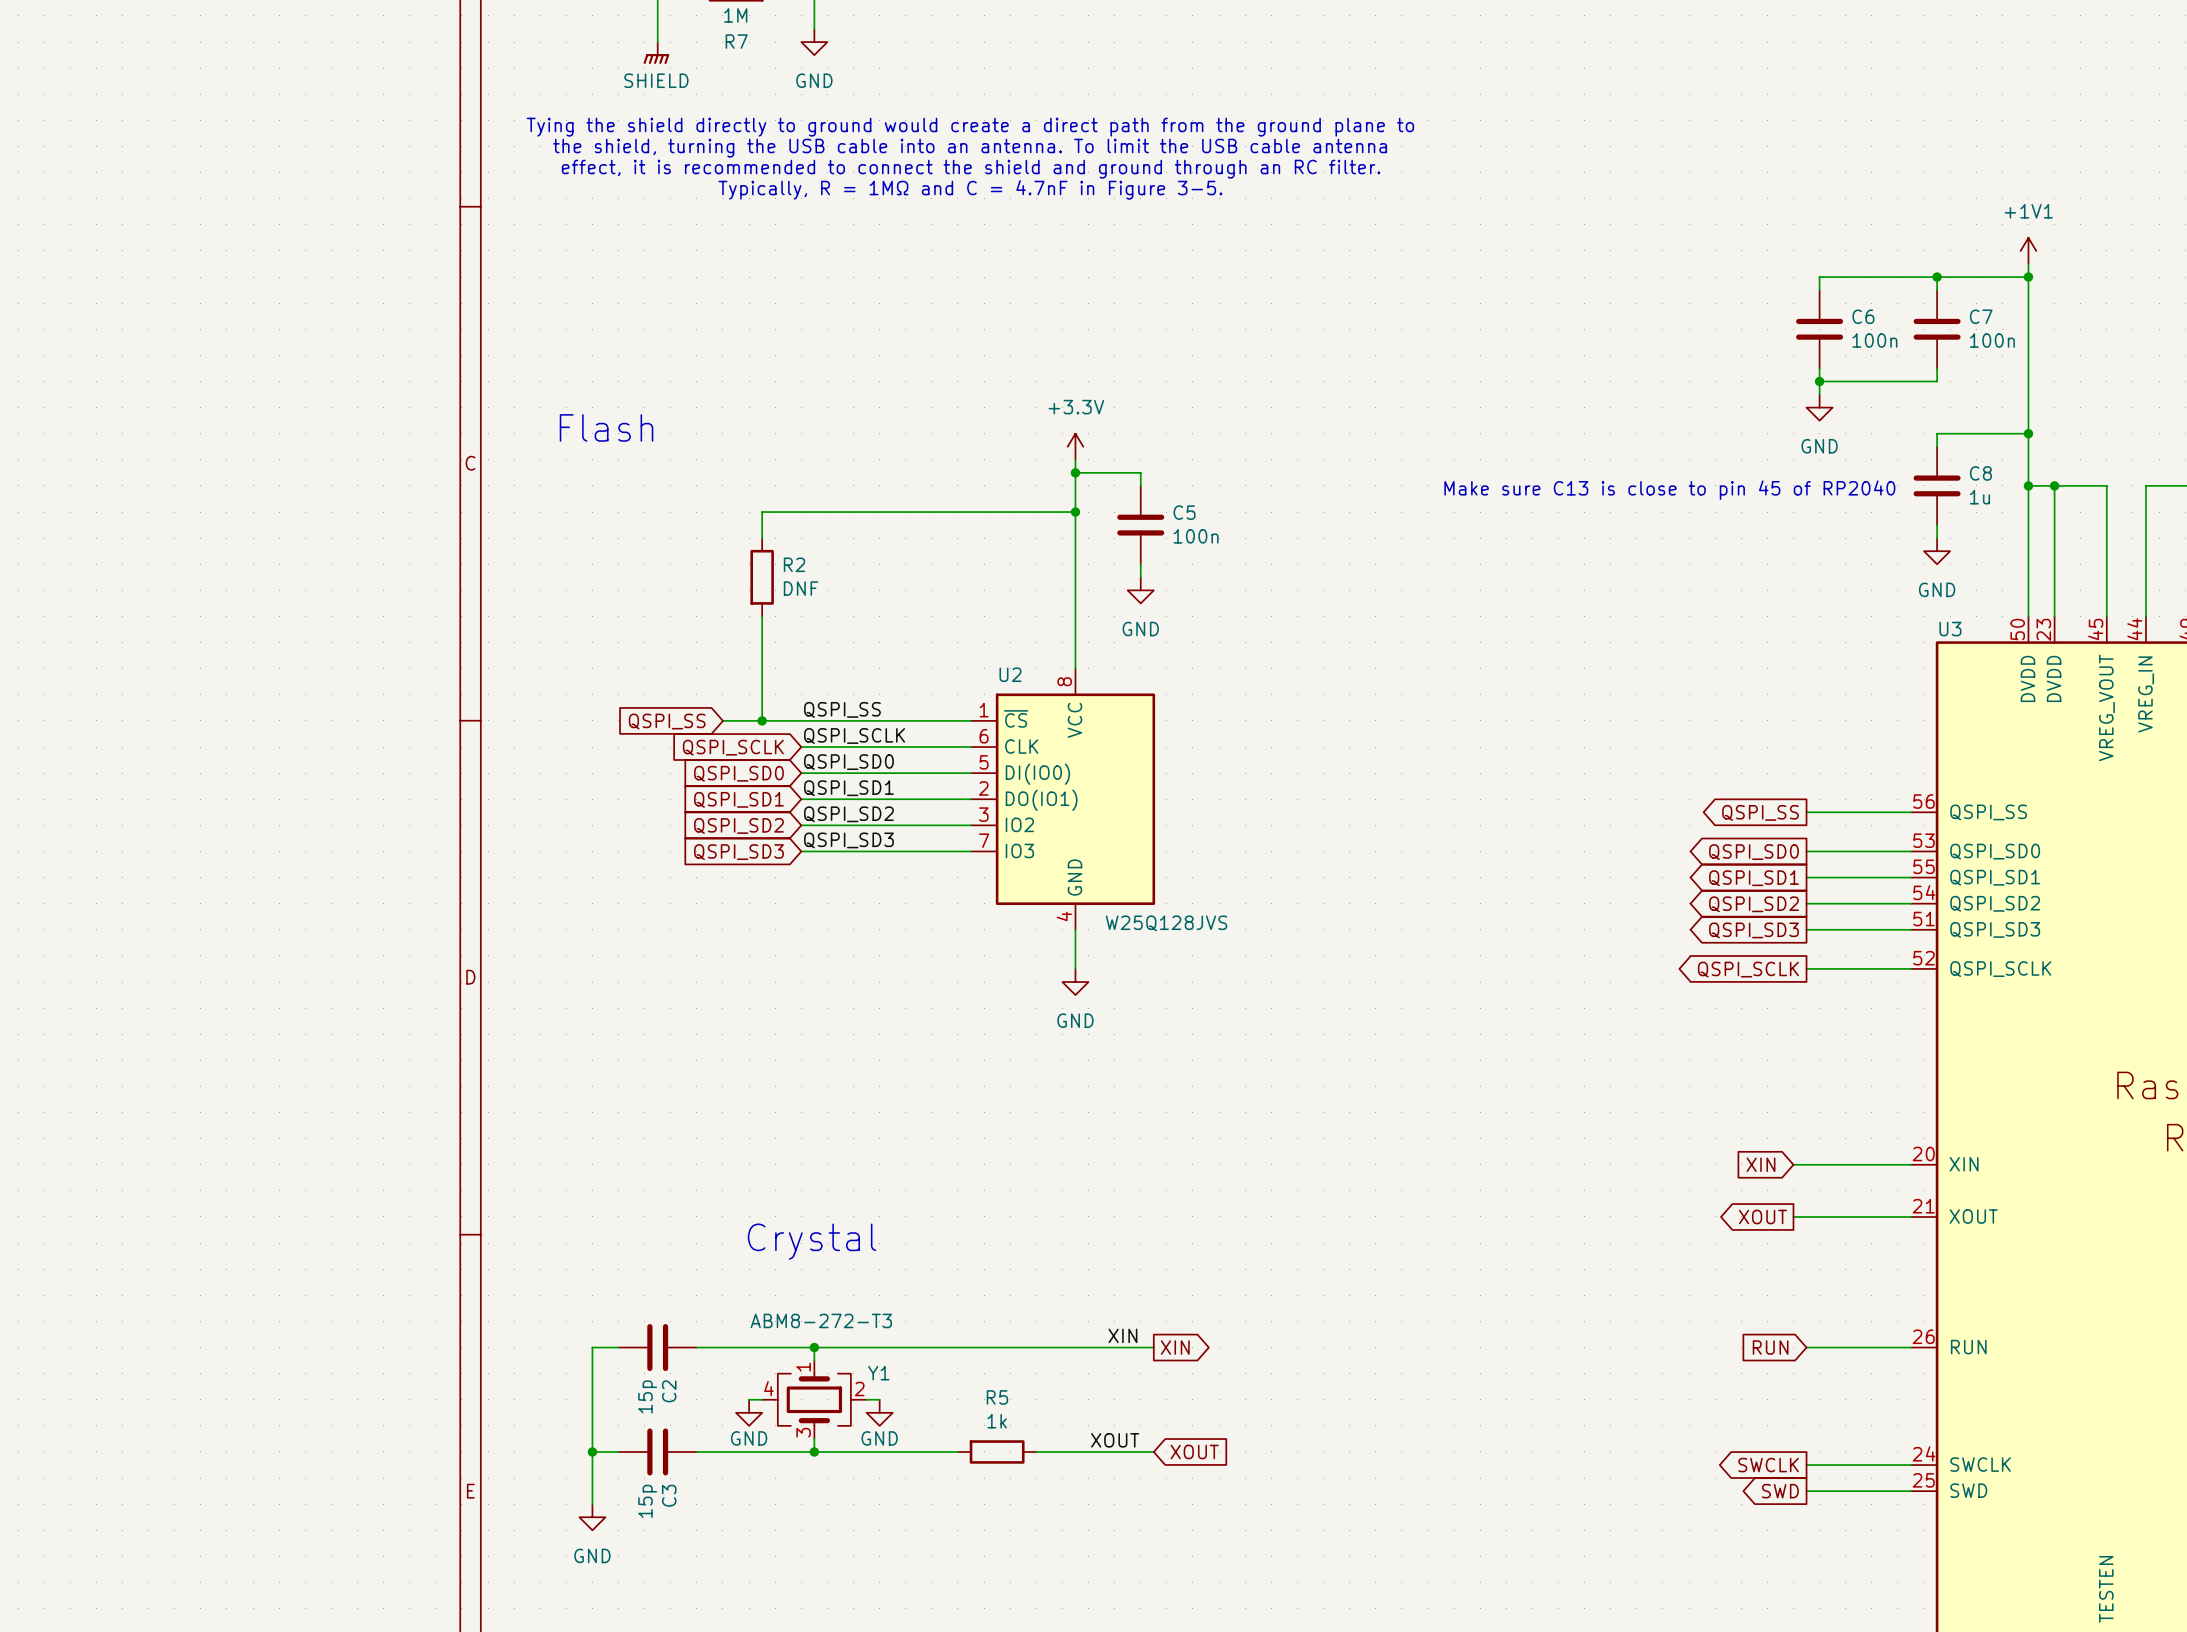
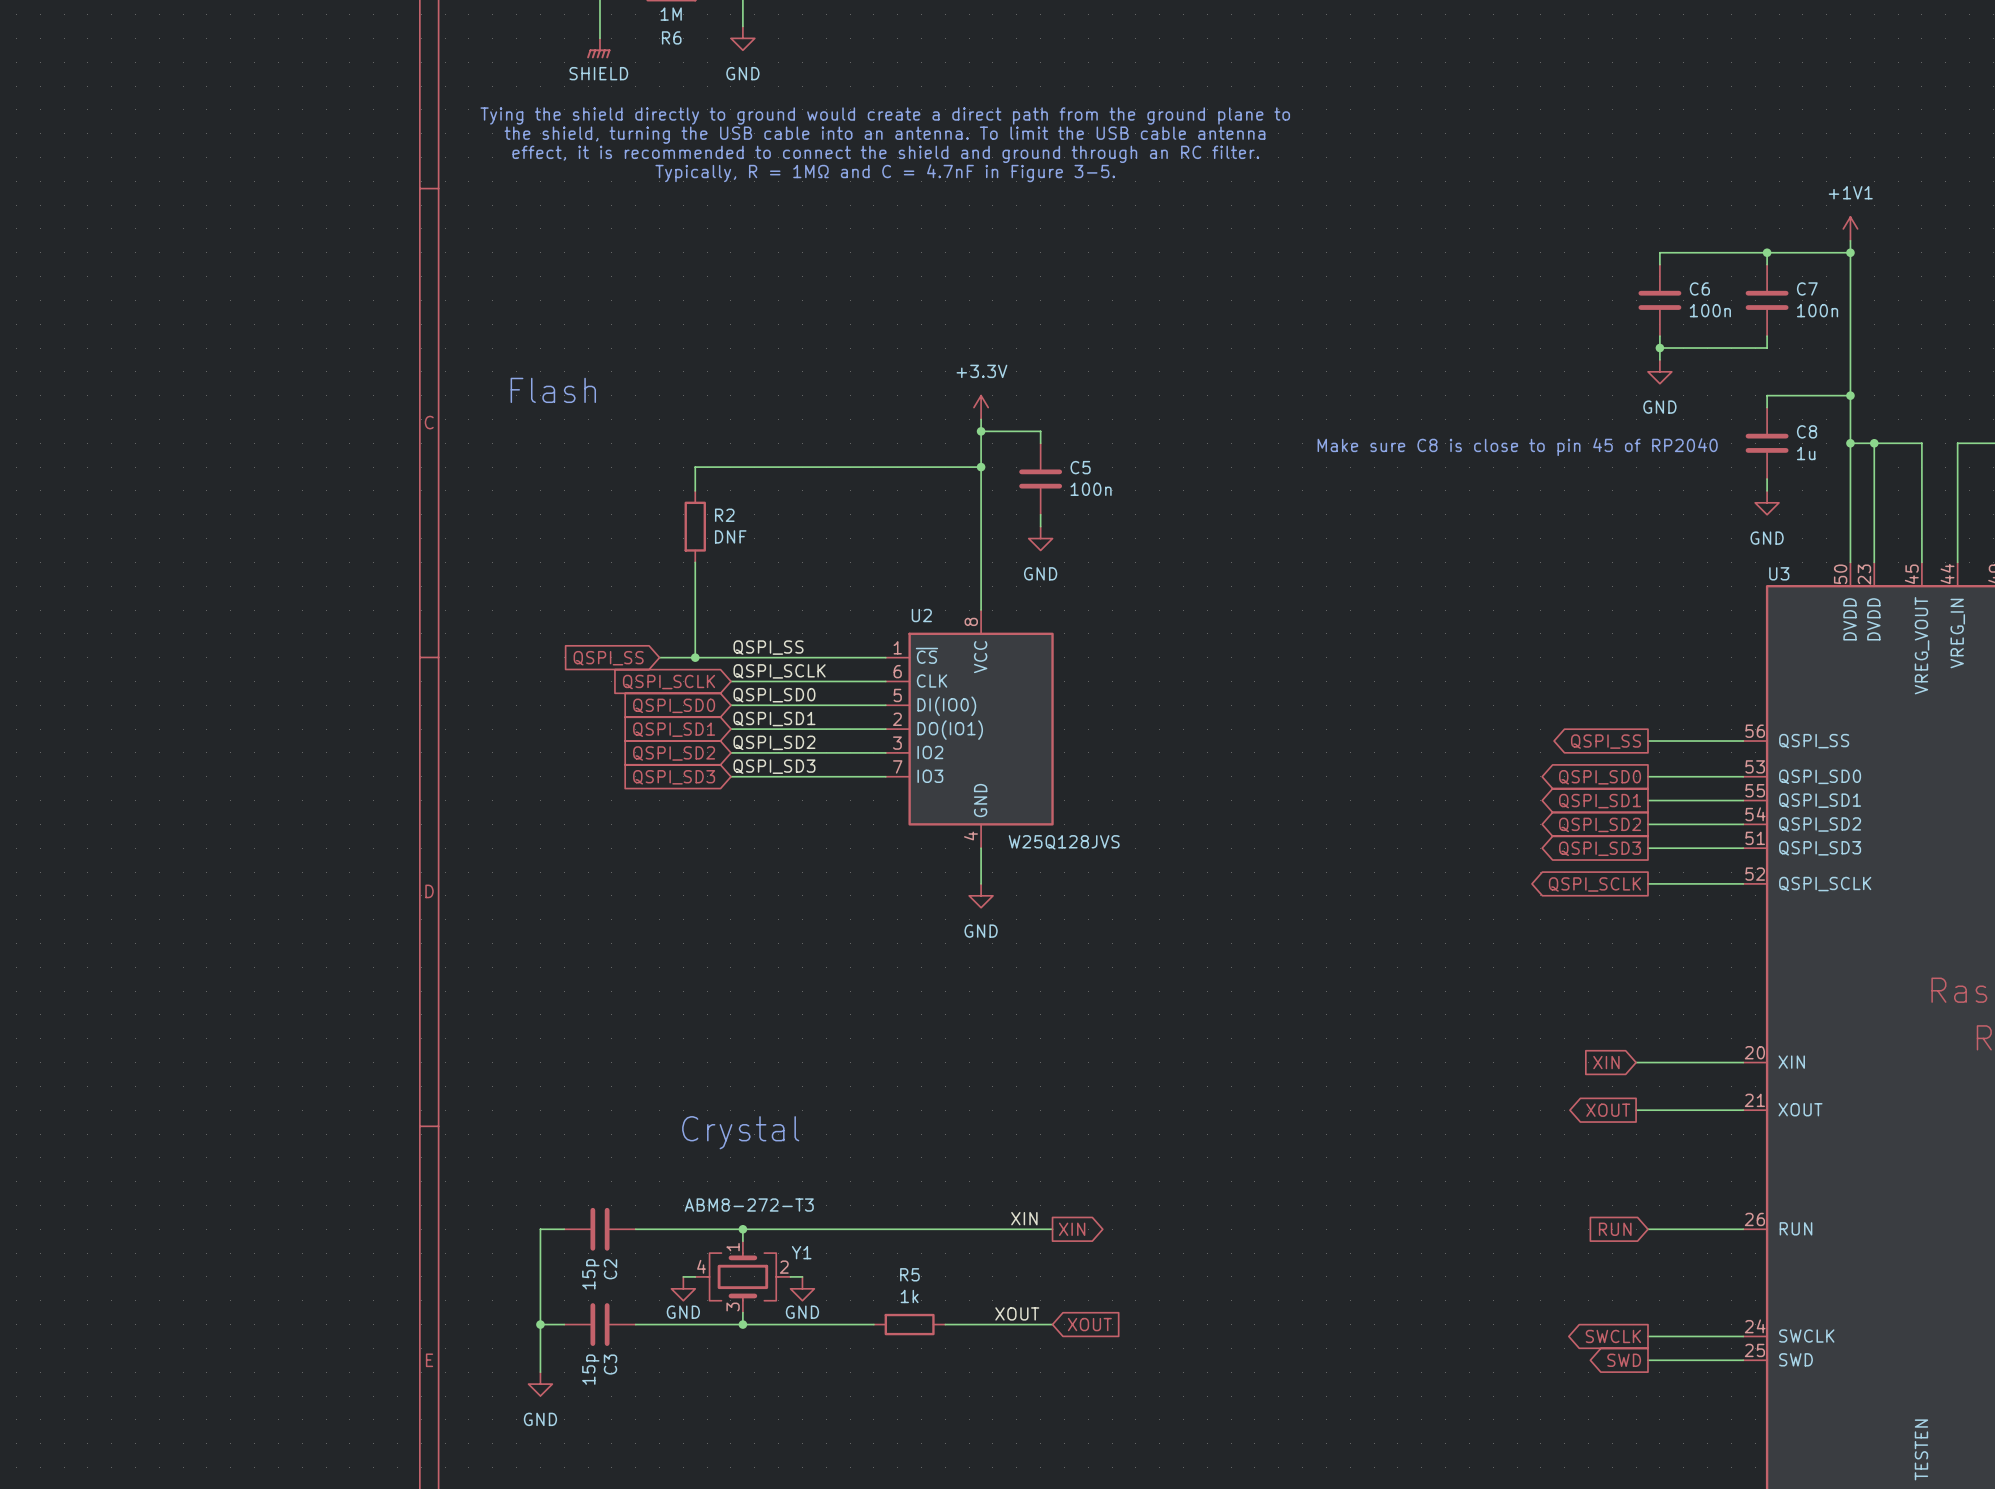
R7 name: R7 (736, 41) -> R6 (671, 37)
text: Make sure C13 is close to pin 45 of RP2040 (1669, 490) -> Make sure C8 is close to pin 45 of RP2040 (1517, 447)

